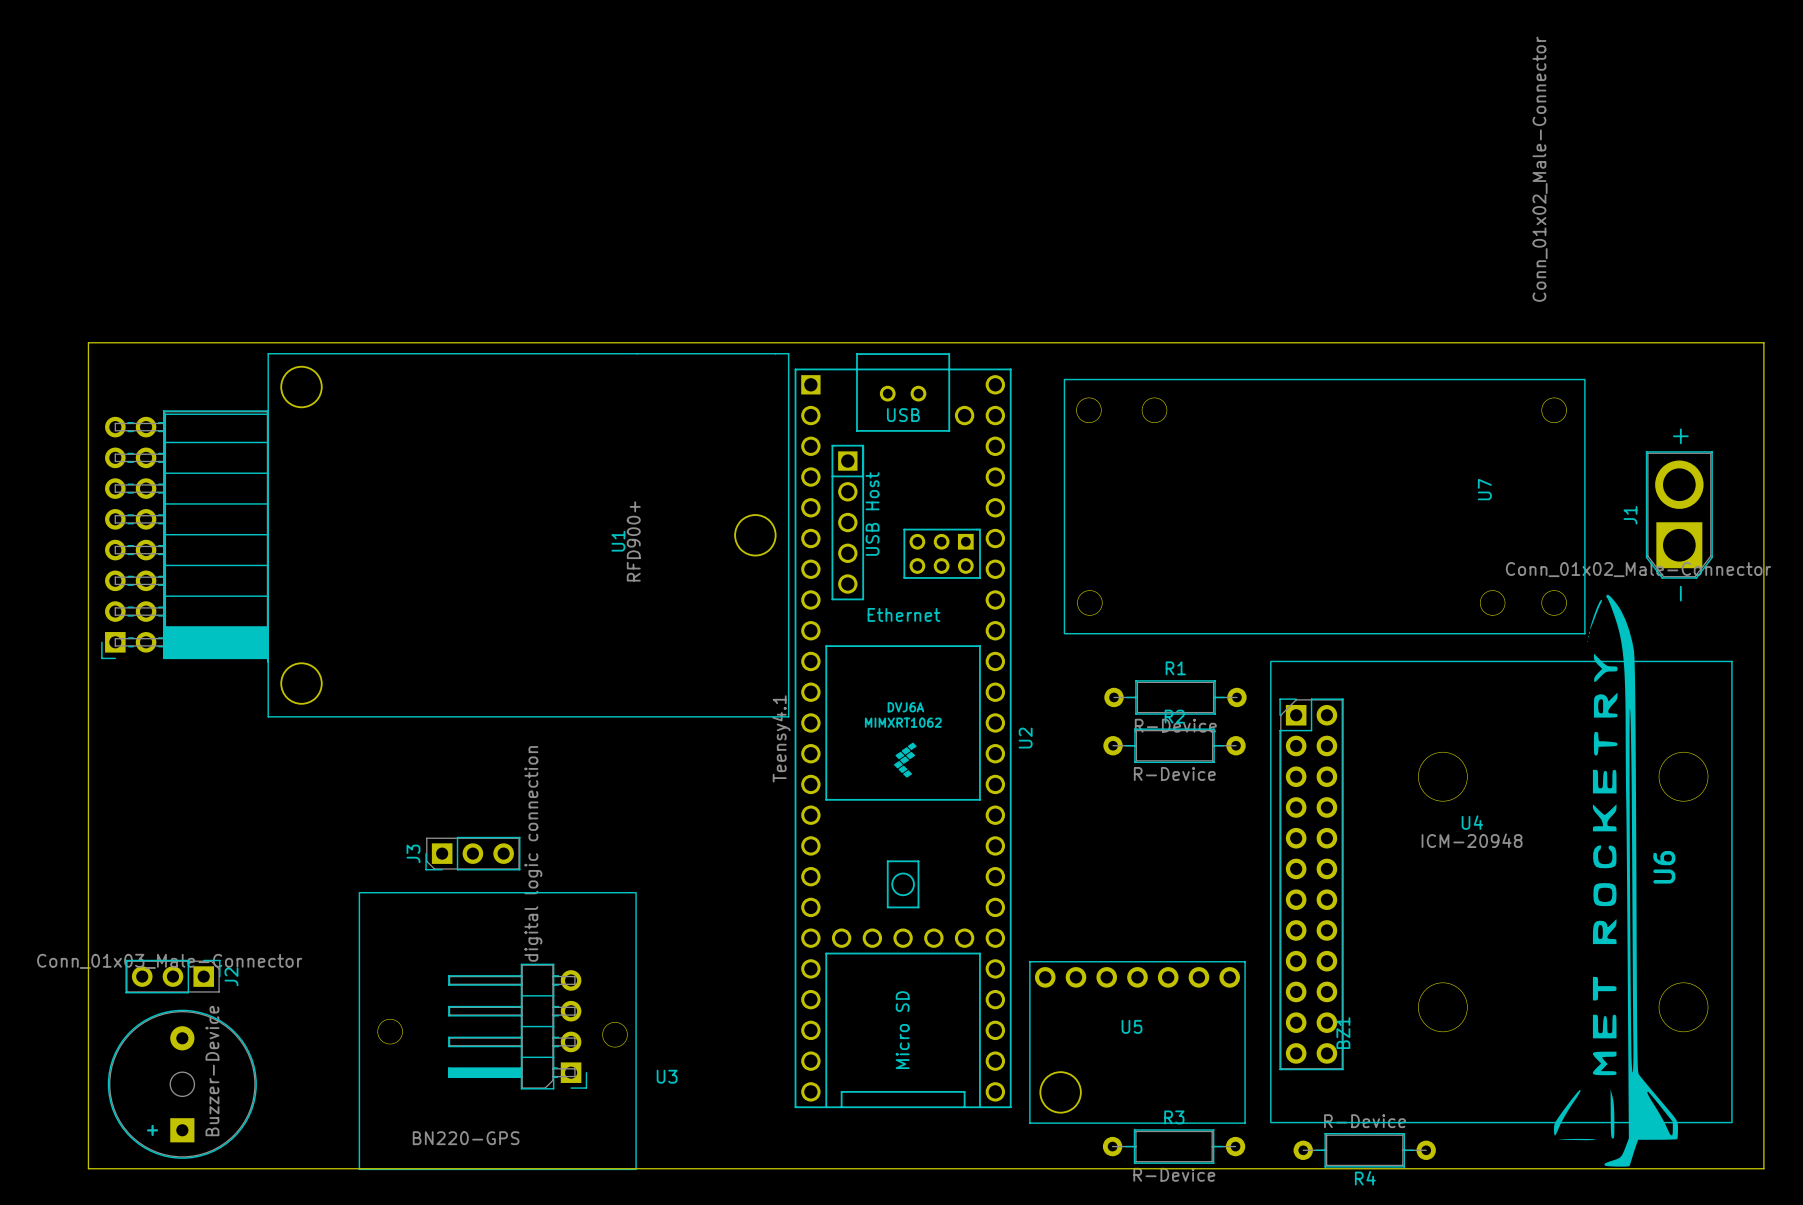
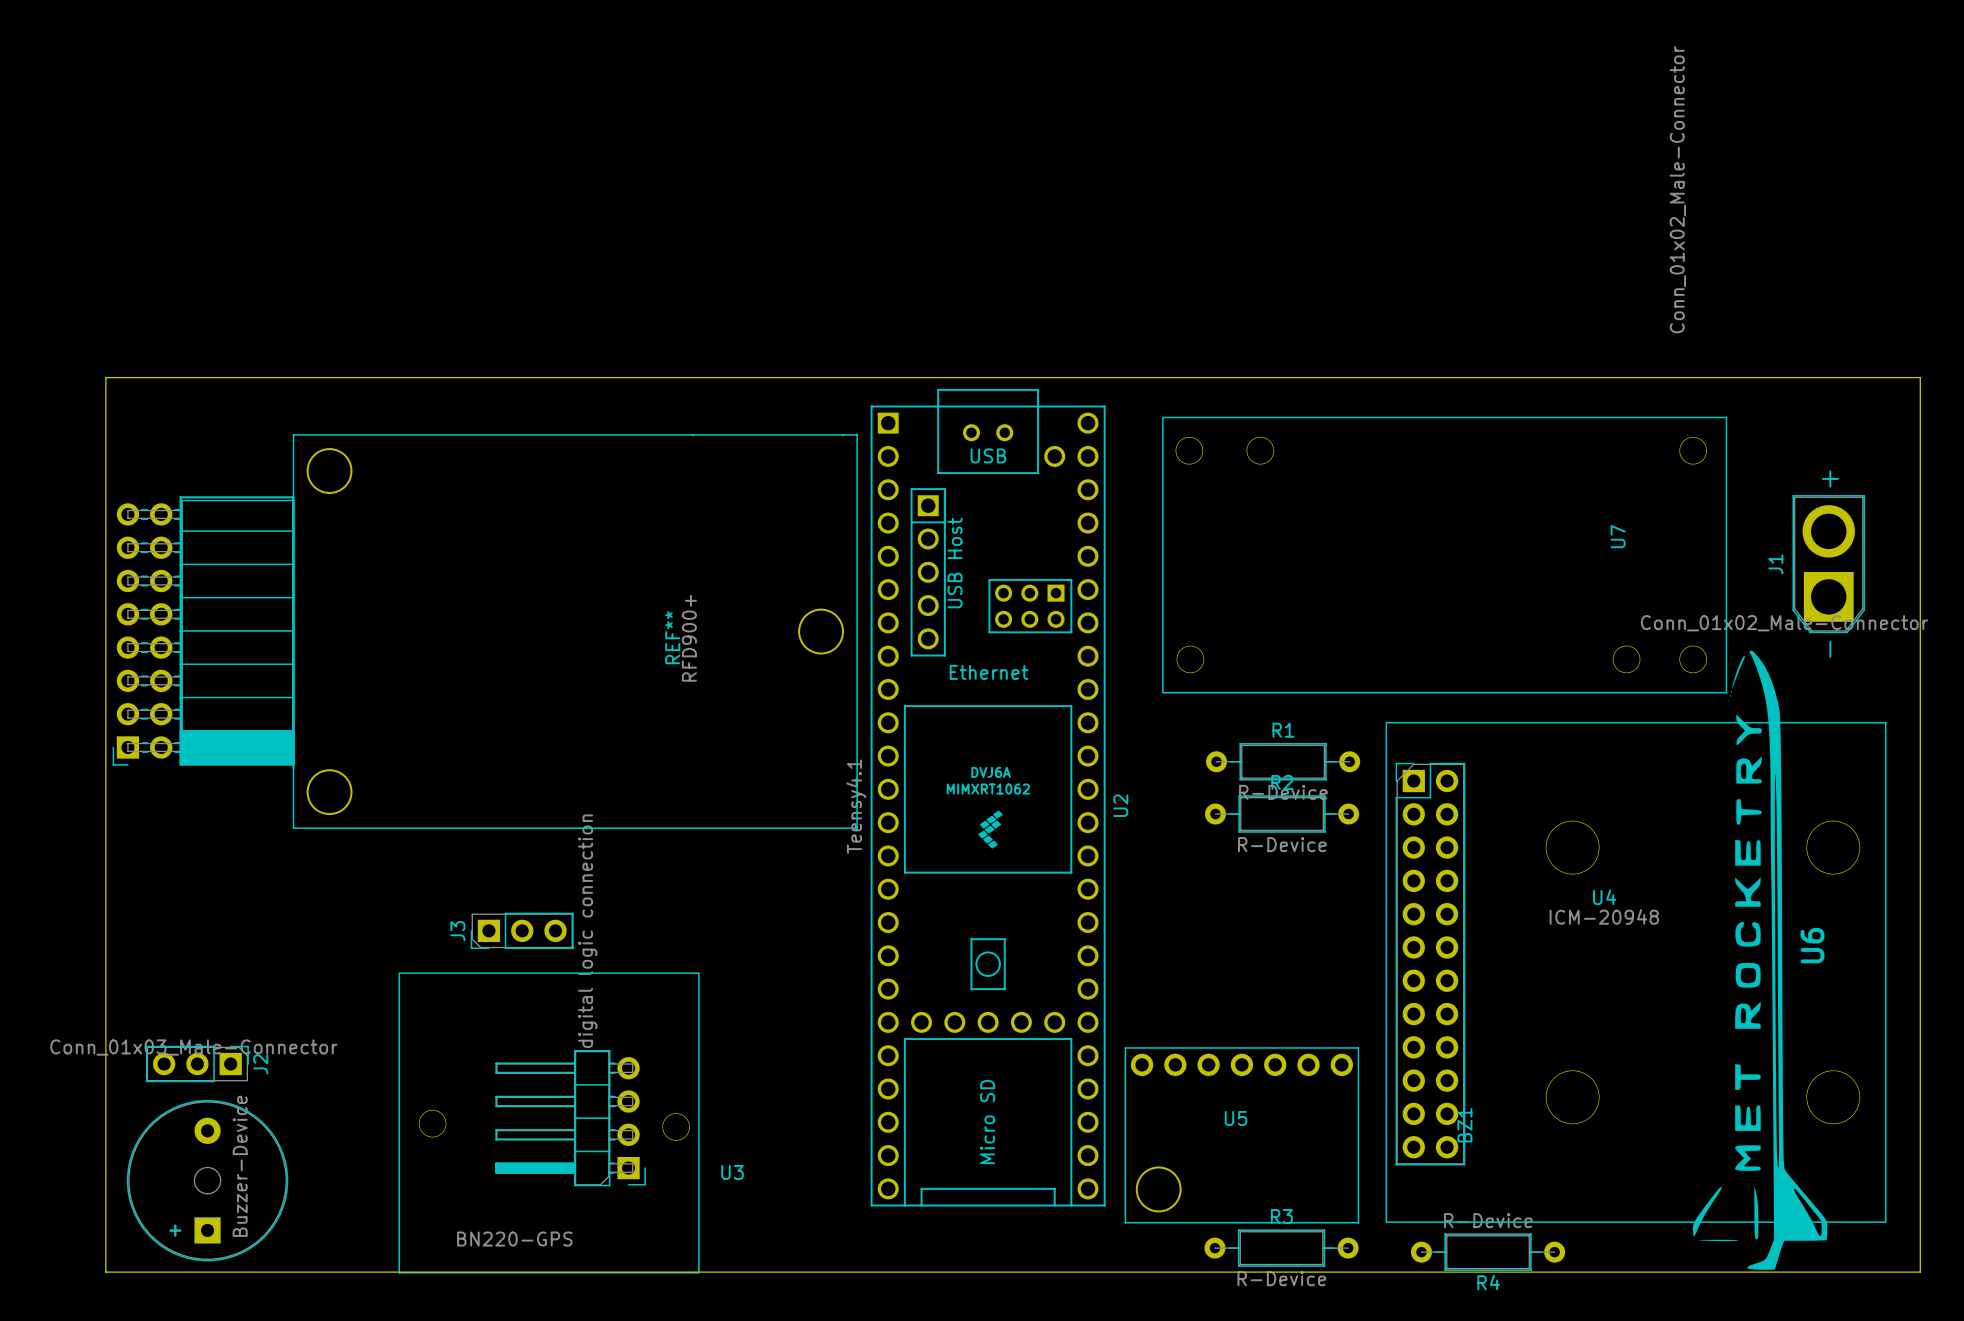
U1: RFD900+ (445, 535) -> none
REF**: none -> RFD900+ (485, 631)

